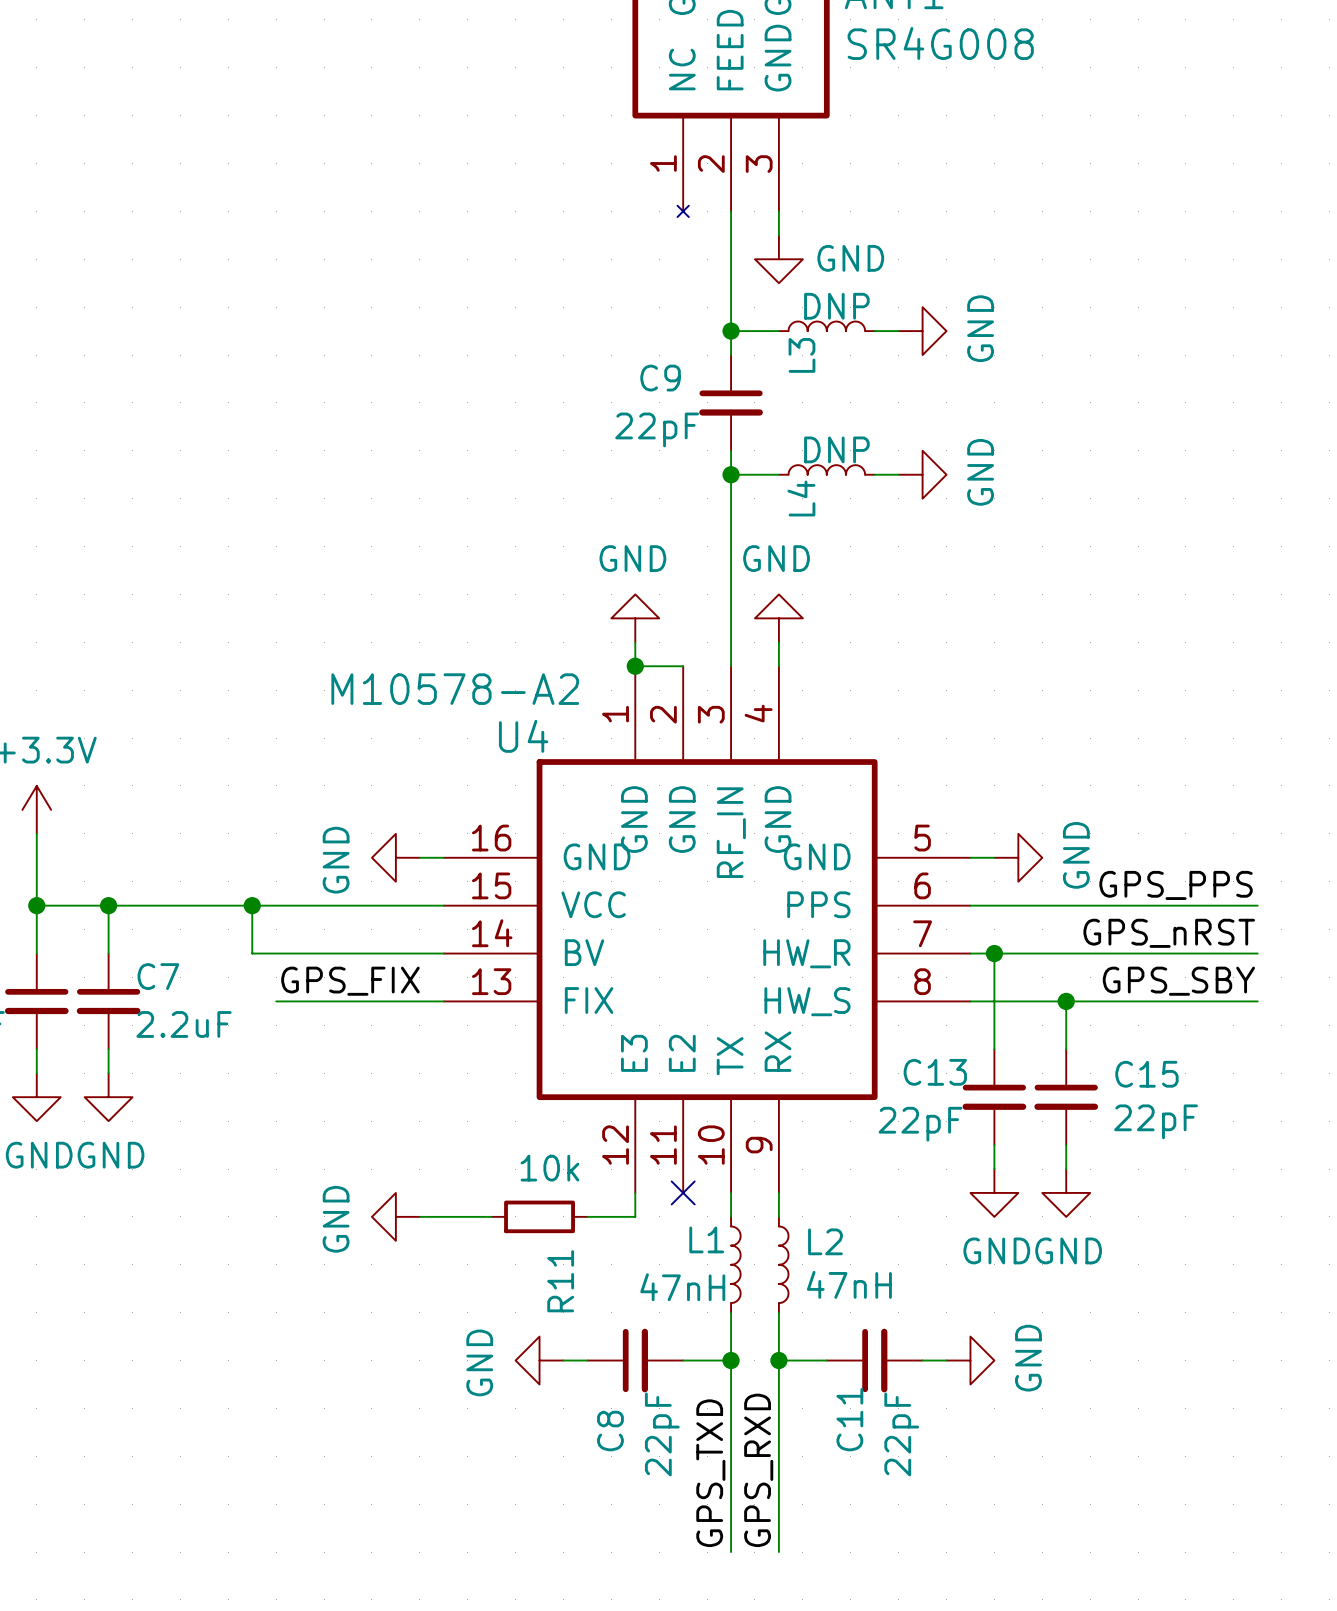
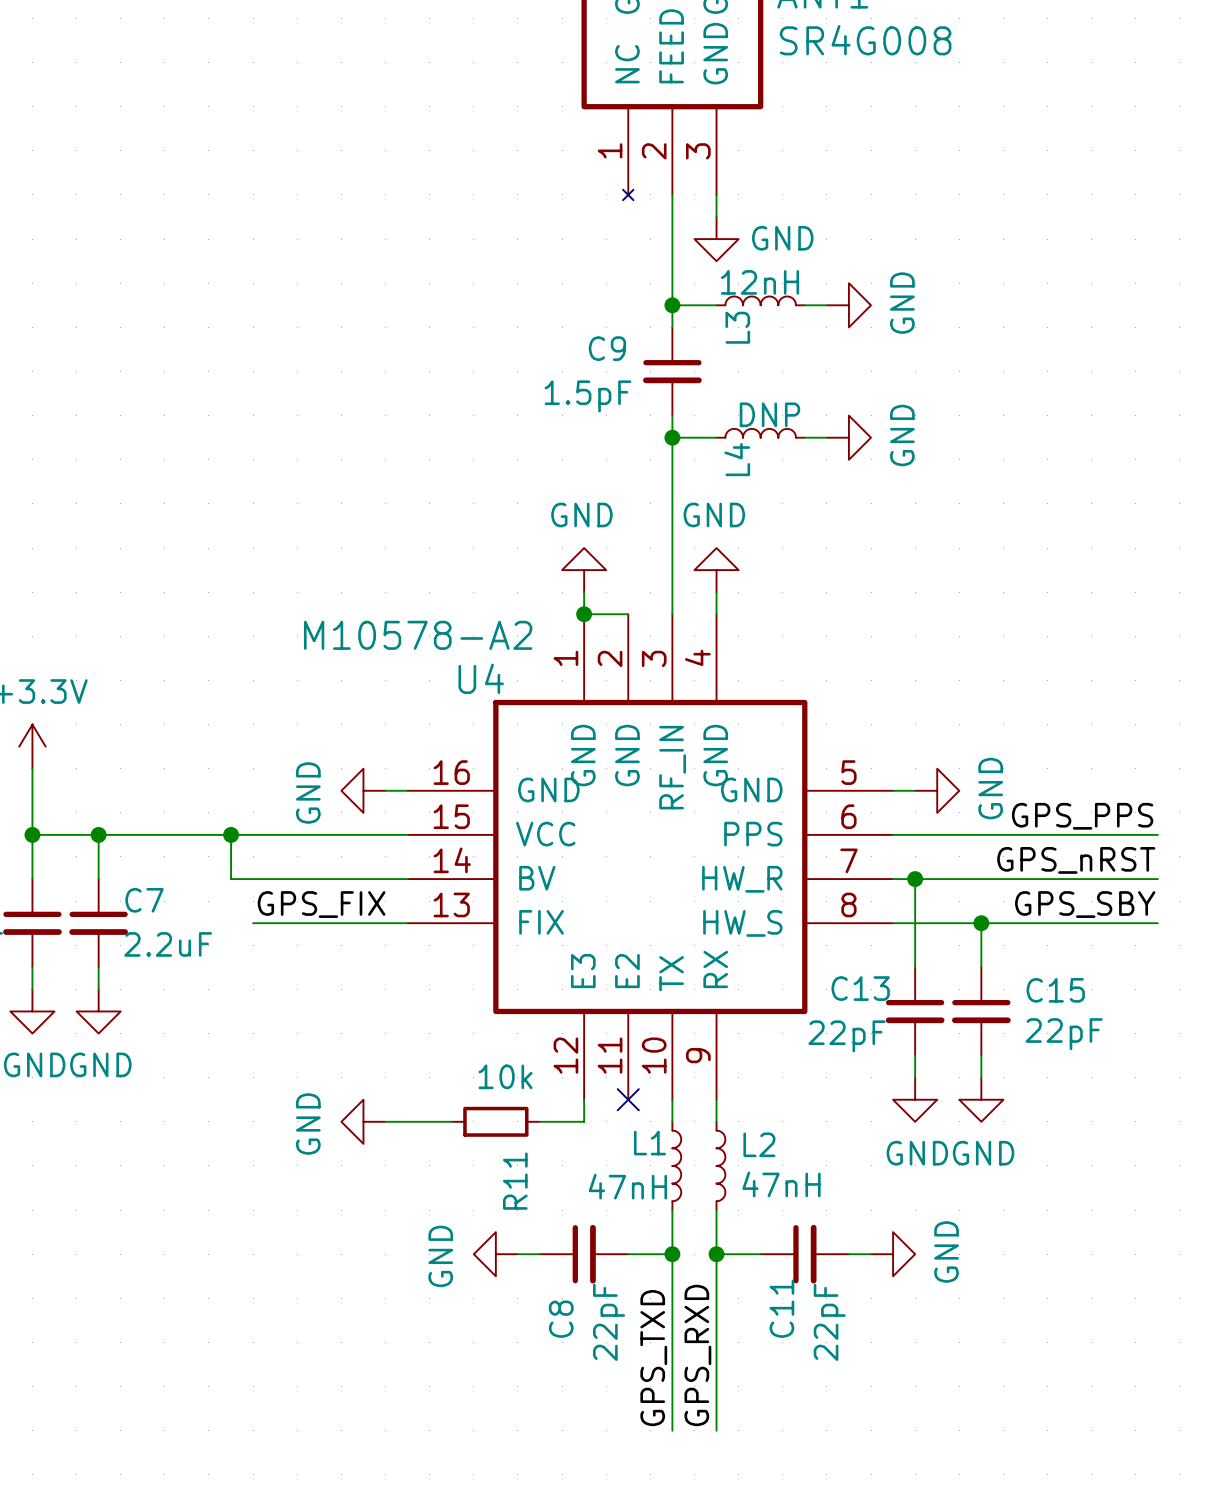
L3 value: DNP (836, 306) -> 12nH (759, 282)
C9 value: 22pF (657, 429) -> 1.5pF (587, 396)

